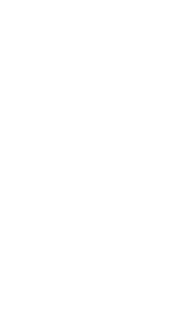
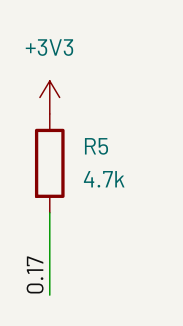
power symbol: none -> +3V3 (49, 97)
R5: none -> 4.7k (49, 163)
wire: none -> (49, 212) (49, 295)
label: none -> 0.17 (35, 274)

